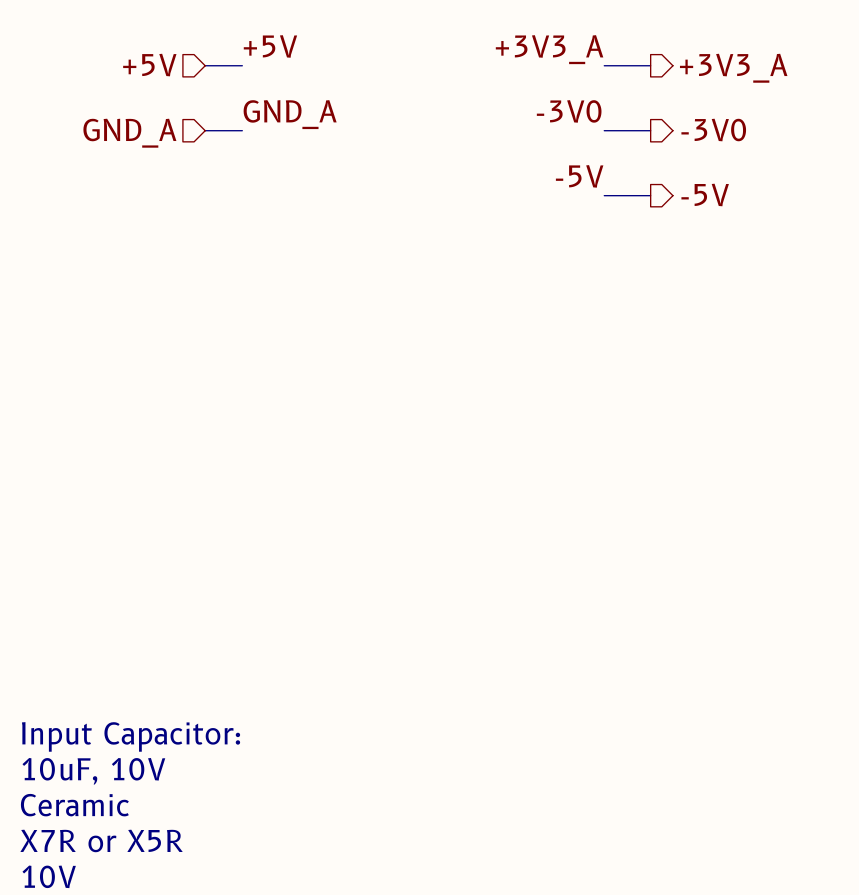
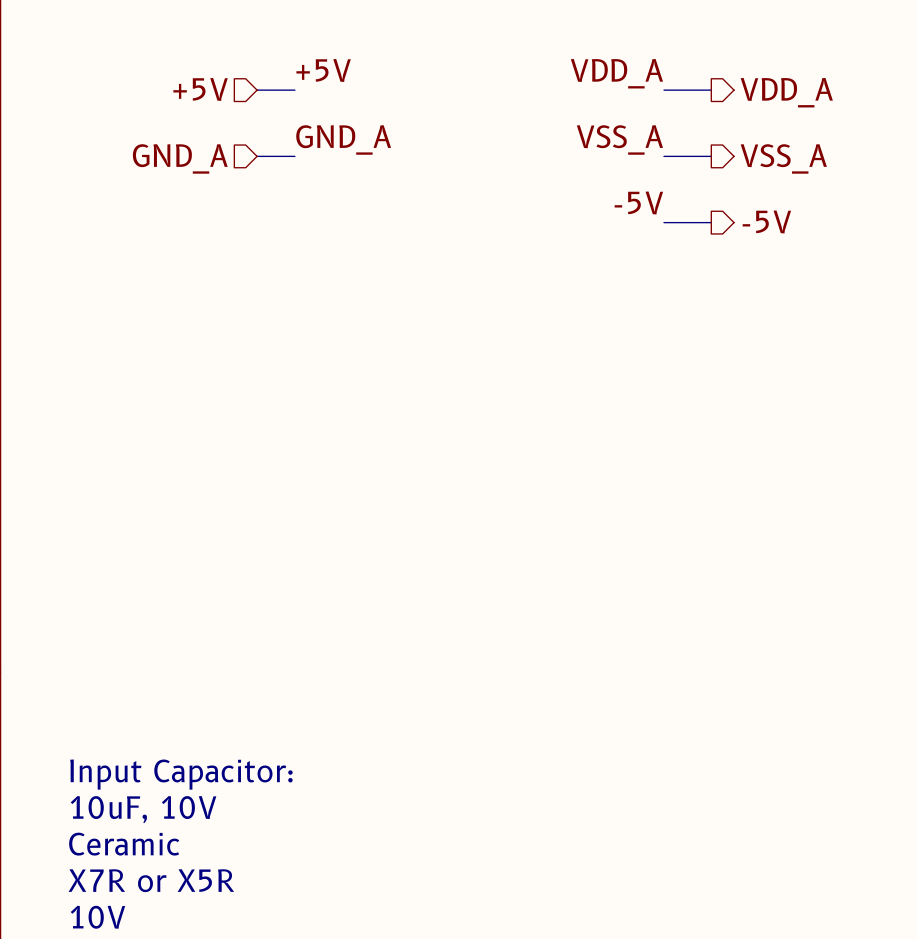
label: +3V3_A (549, 49) -> VDD_A (616, 73)
hierarchical label: +3V3_A (733, 68) -> VDD_A (786, 92)
label: -3V0 (569, 111) -> VSS_A (619, 139)
hierarchical label: -3V0 (713, 130) -> VSS_A (783, 158)

